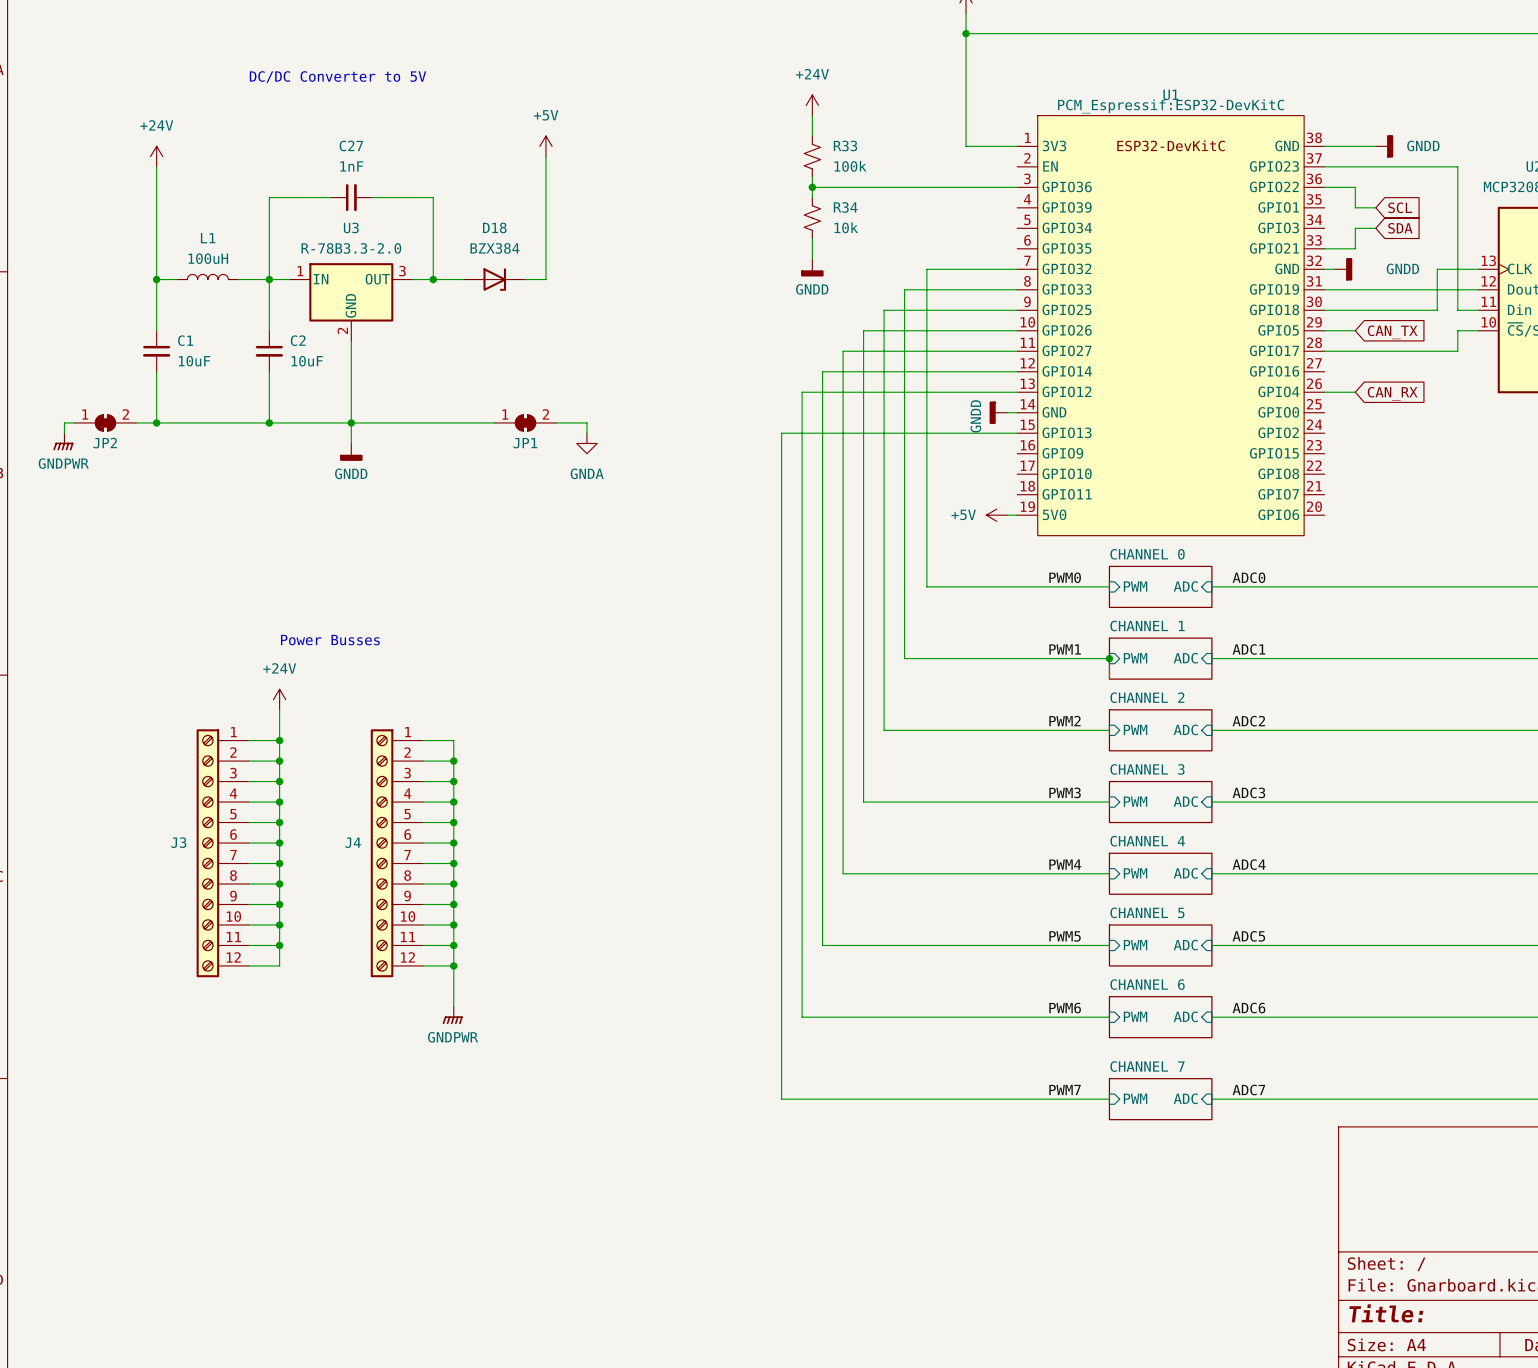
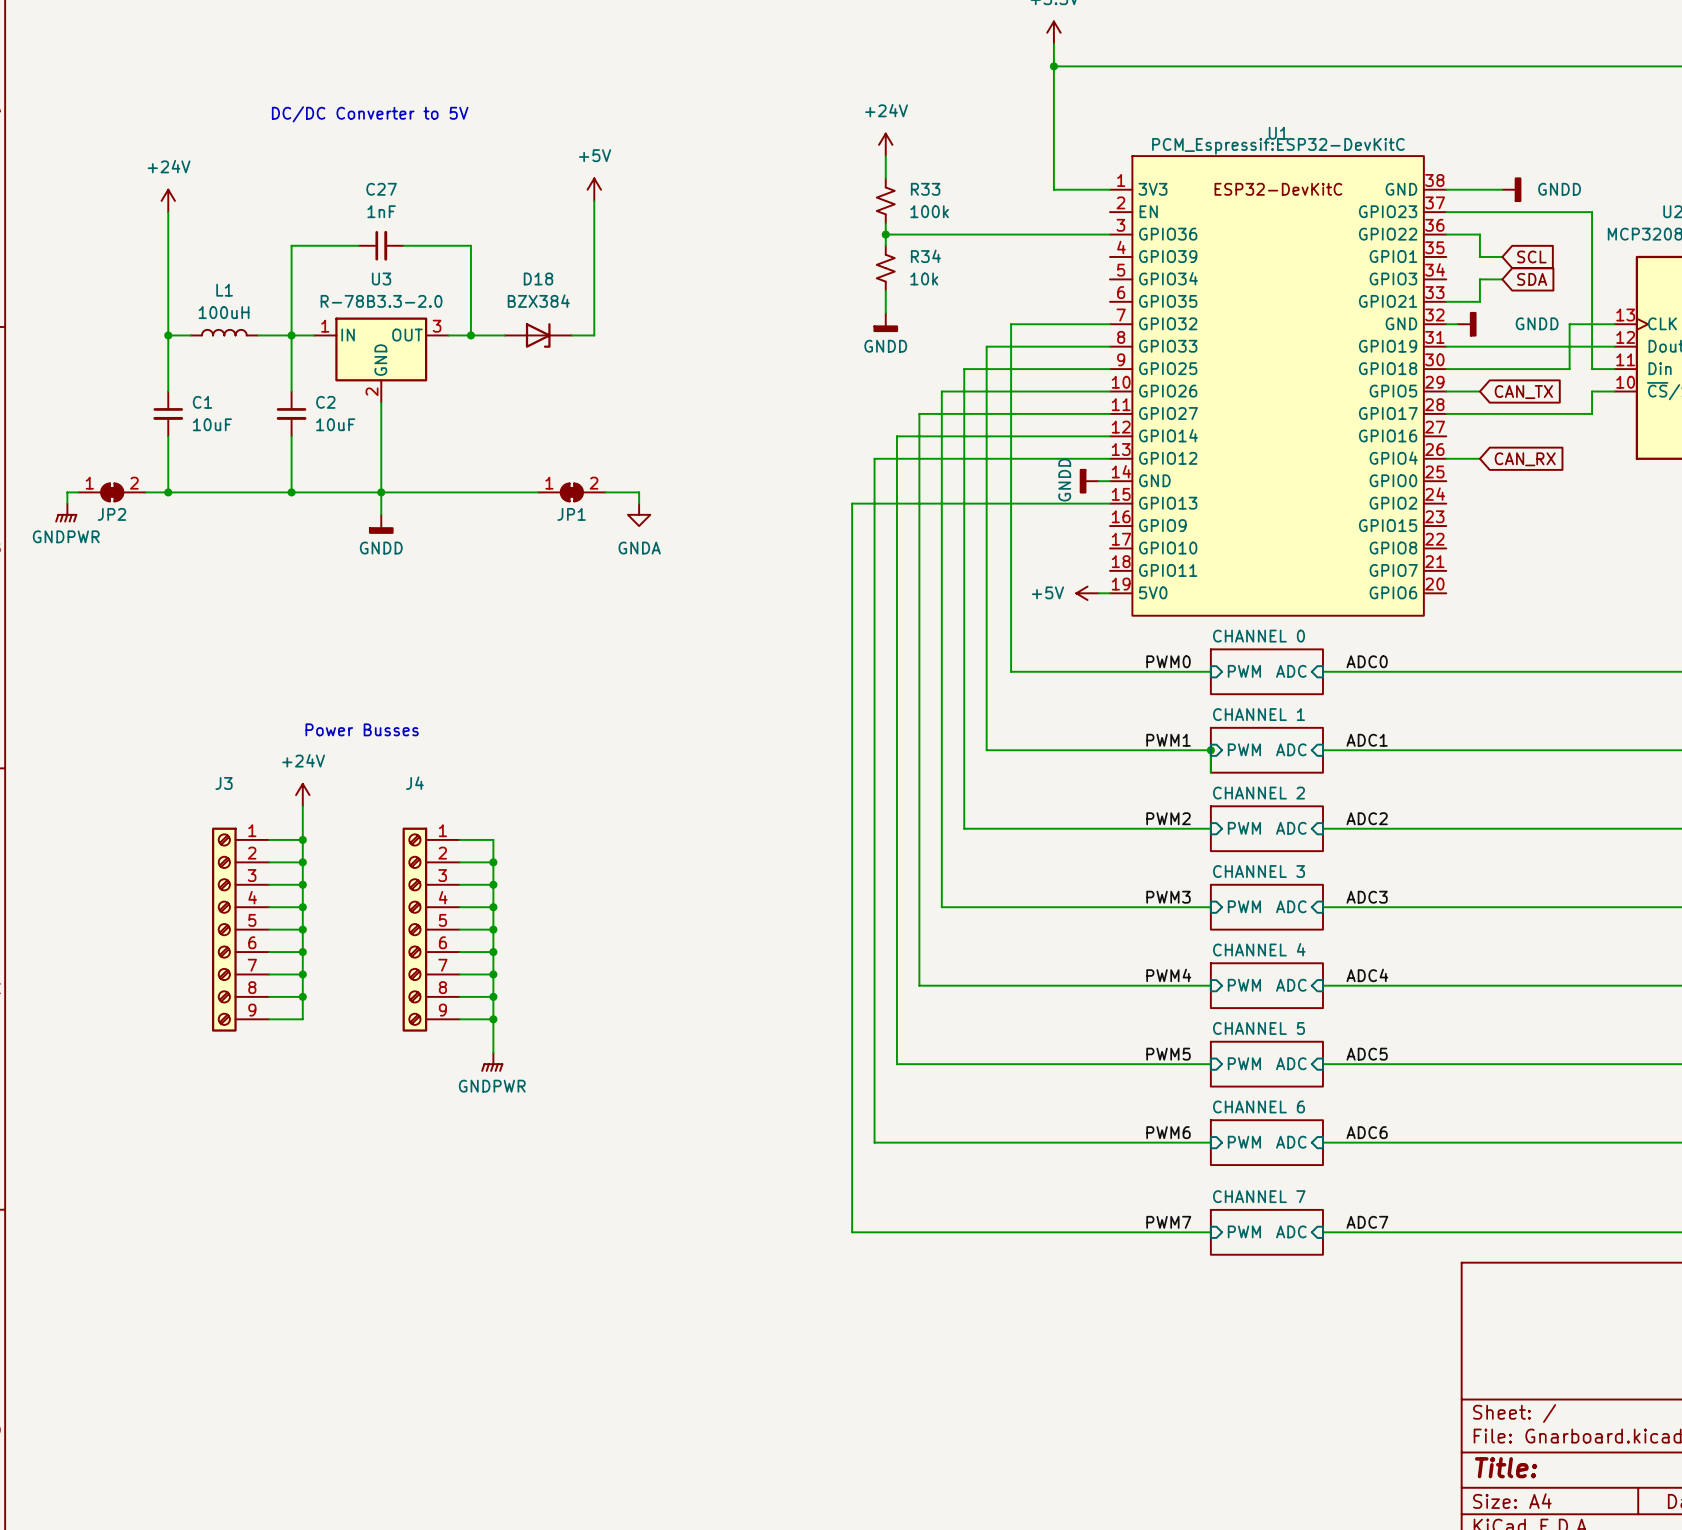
J3 symbol: [196, 729, 249, 978] -> [211, 827, 270, 1032]
J4 symbol: [370, 729, 424, 978] -> [402, 827, 460, 1032]
J3 name position: J3 (178, 842) -> J3 (224, 783)
J4 name position: J4 (353, 842) -> J4 (414, 783)
wire: (279, 904) (279, 965) (248, 965) -> none
junction: (279, 904) -> none
wire: (248, 924) (279, 924) -> none
junction: (279, 924) -> none
wire: (423, 924) (453, 924) -> none
junction: (453, 924) -> none
wire: (453, 935) (453, 1006) -> none
wire: (248, 945) (279, 945) -> none
junction: (279, 945) -> none
wire: (423, 945) (453, 945) -> none
junction: (453, 945) -> none
wire: (423, 965) (453, 965) -> none
junction: (453, 965) -> none
power symbol position: GNDPWR (452, 1015) -> GNDPWR (492, 1062)

